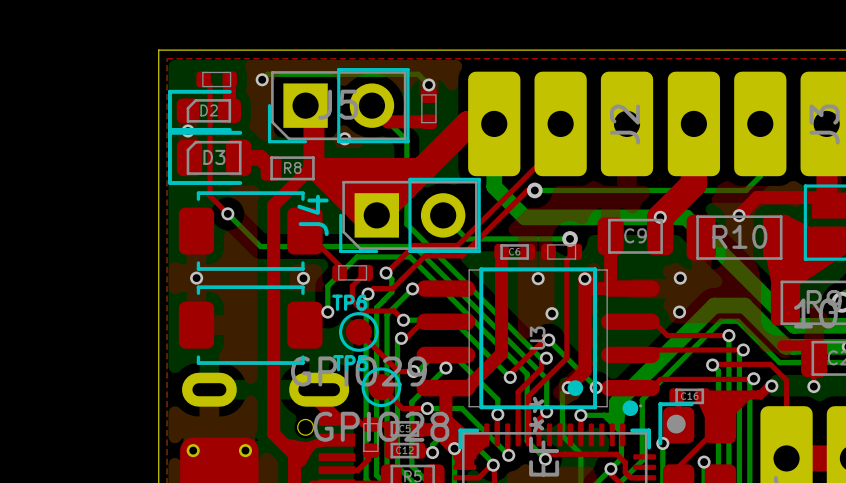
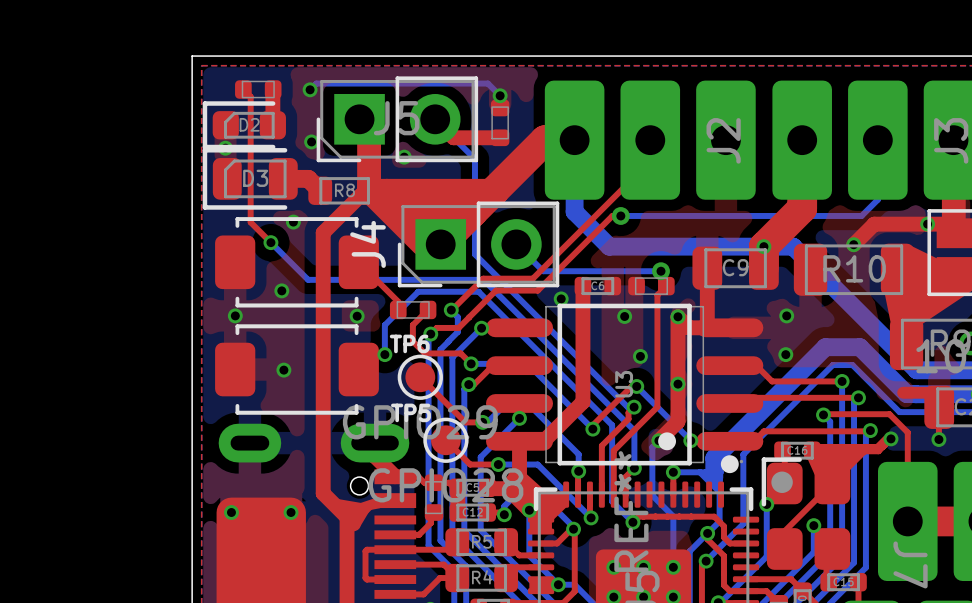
via: none -> (311, 141)
via: none -> (293, 222)
via: none -> (927, 224)
via: none -> (281, 290)
via: none -> (561, 298)
via: none -> (283, 370)
via: none -> (677, 384)

